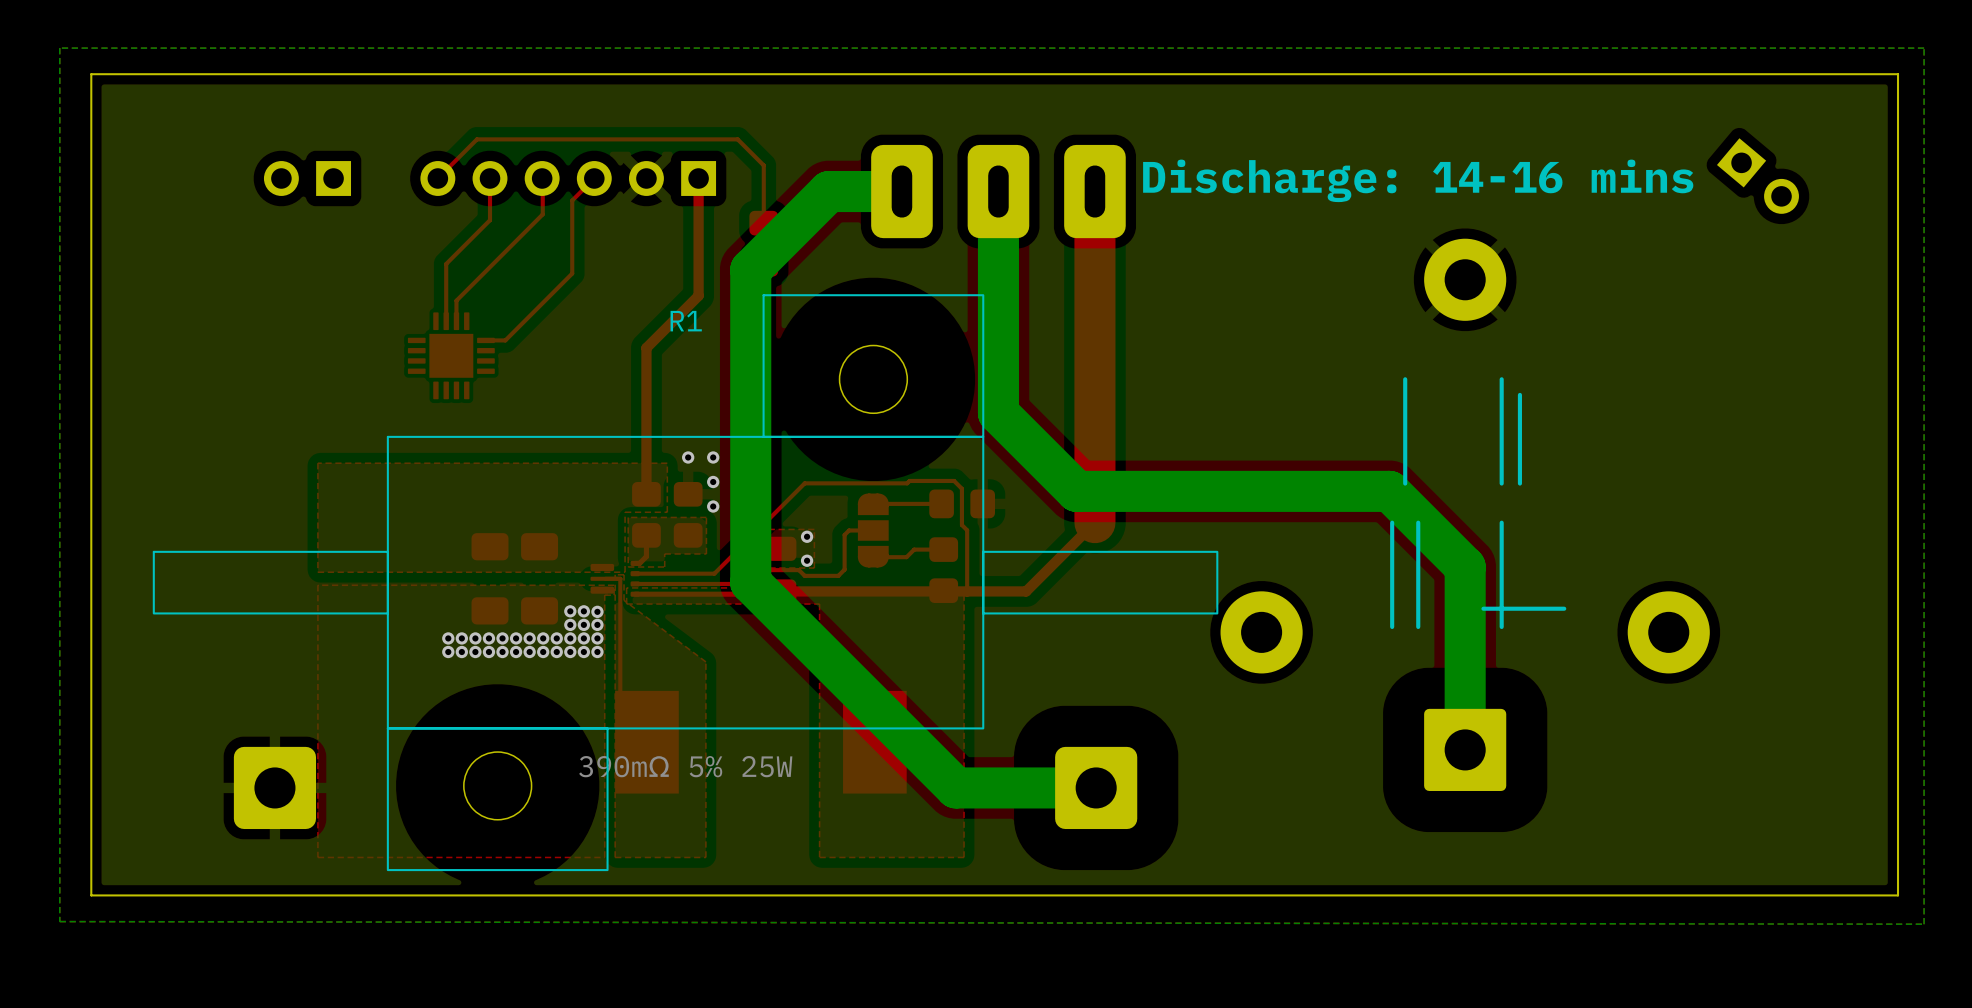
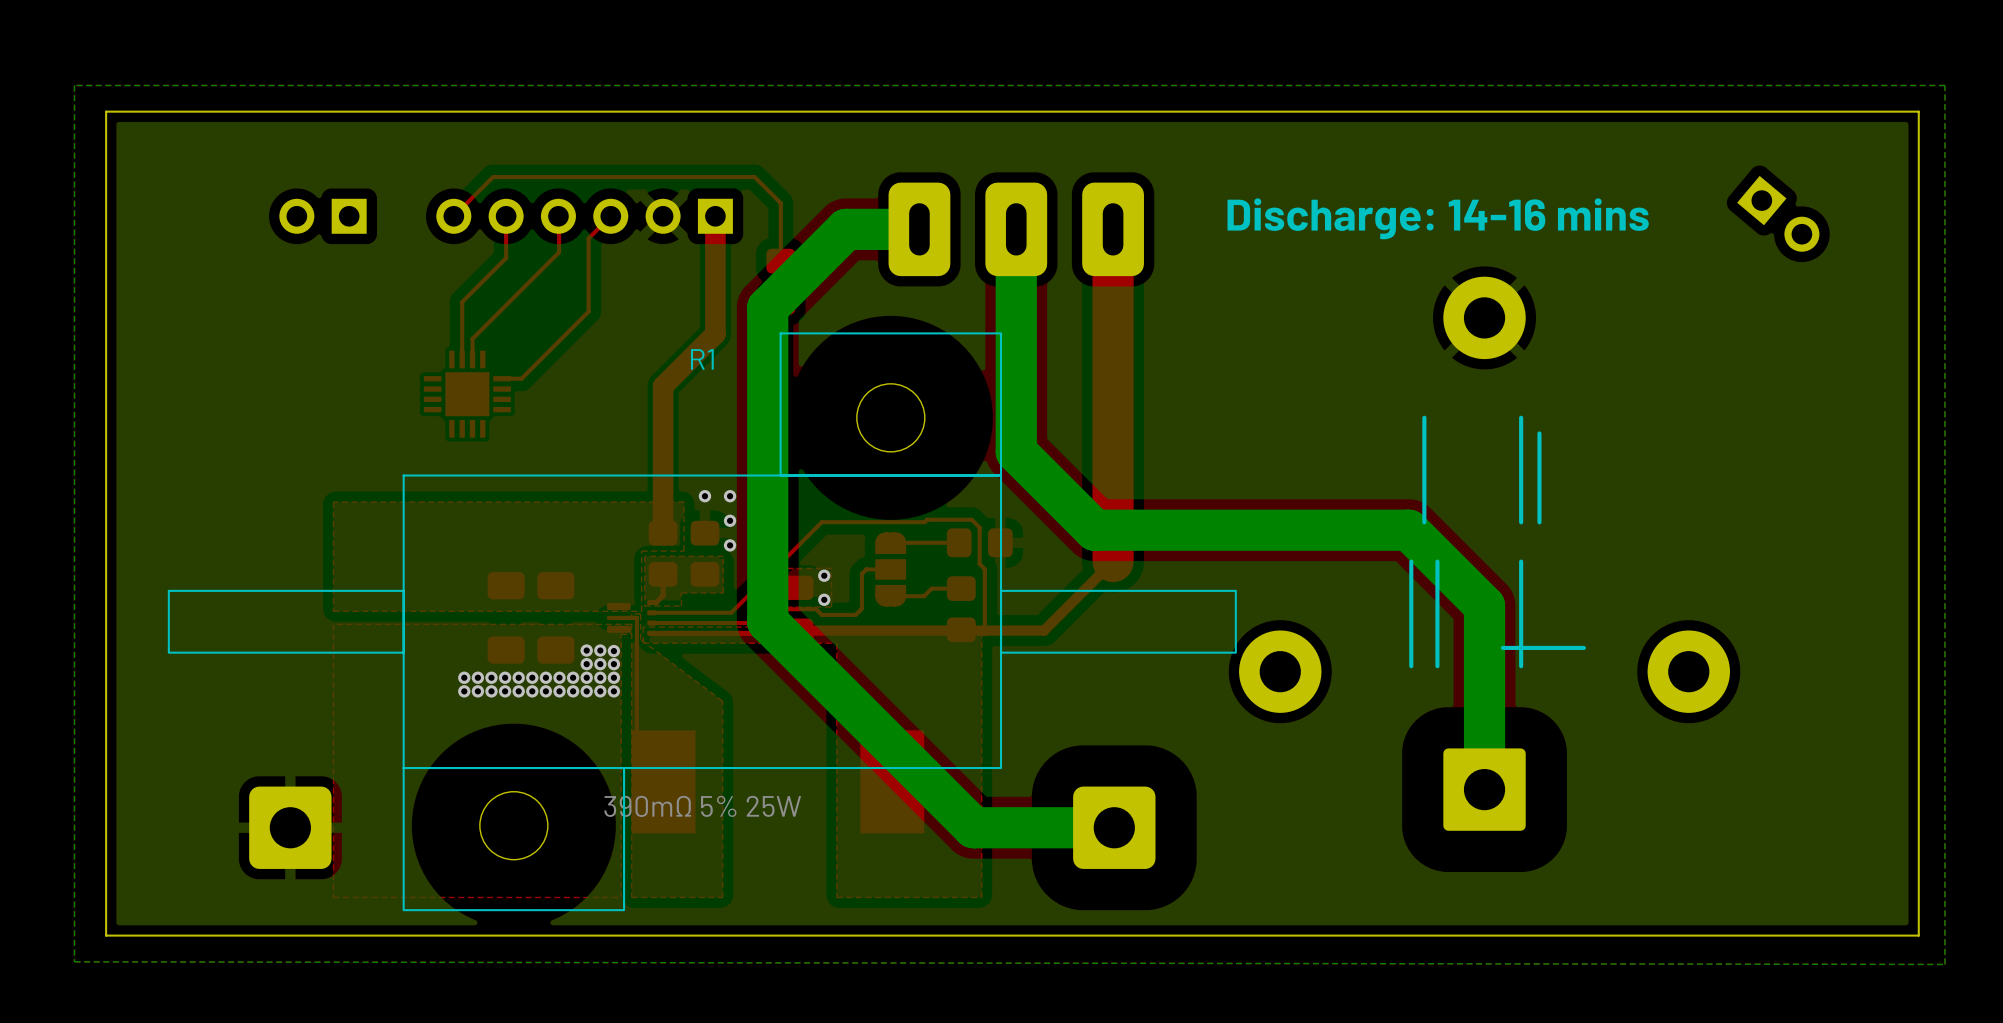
top track width: thin (698, 178) (698, 295) (646, 347) (646, 494) -> thick (715, 216) (715, 334) (663, 386) (663, 533)

